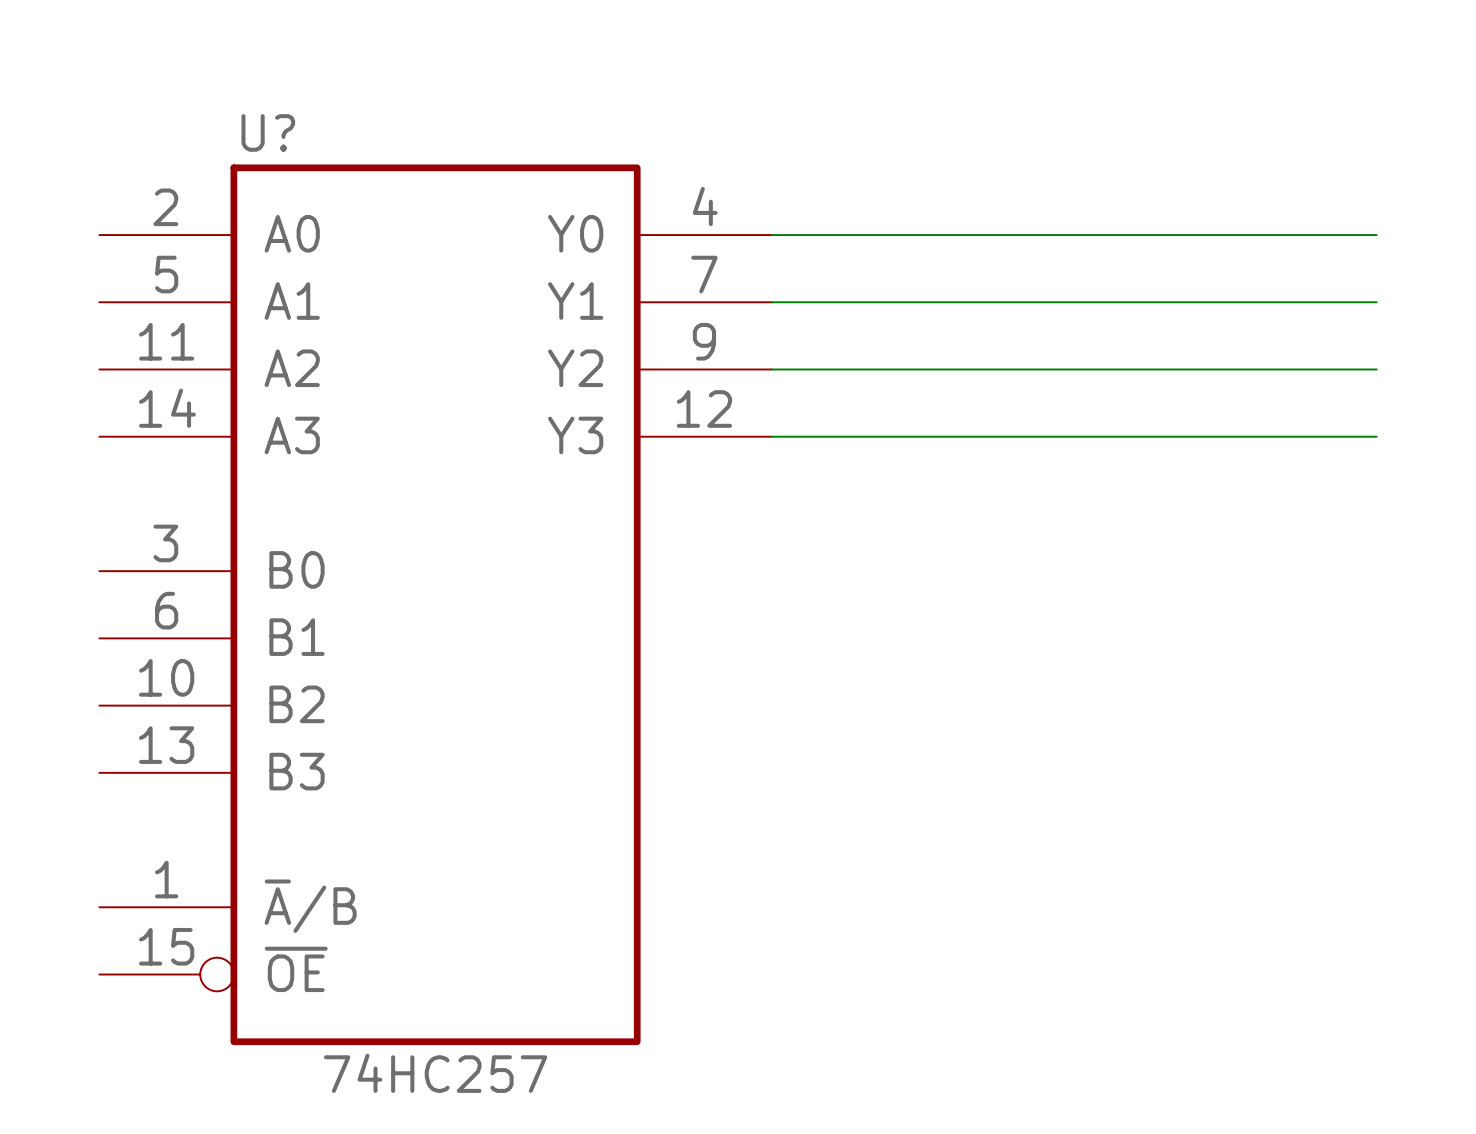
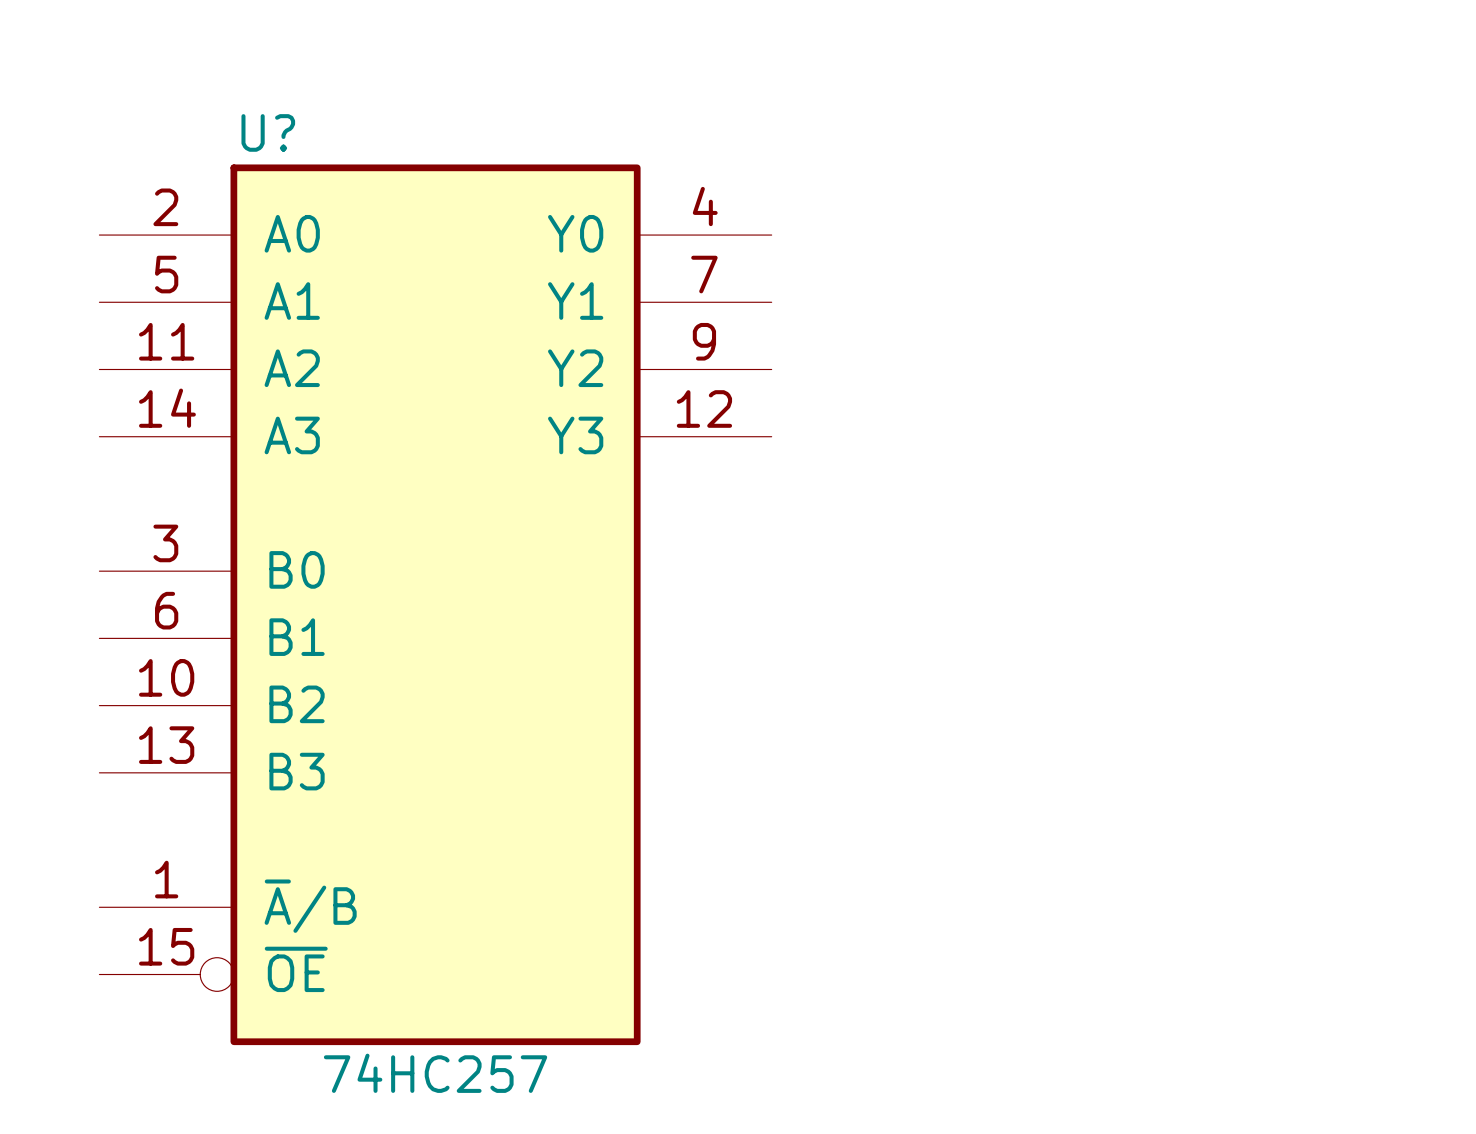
wire: (771, 235) (1376, 235) -> none
wire: (771, 302) (1376, 302) -> none
wire: (771, 369) (1376, 369) -> none
wire: (771, 436) (1376, 436) -> none

